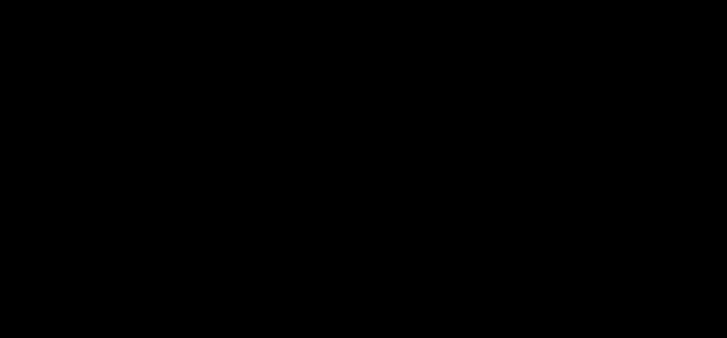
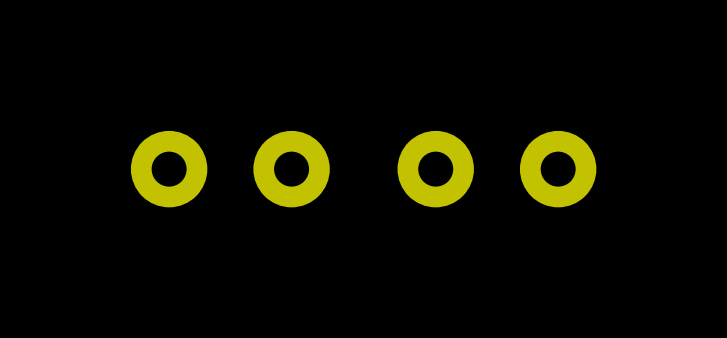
part: none -> (230, 169)
part: none -> (496, 169)

